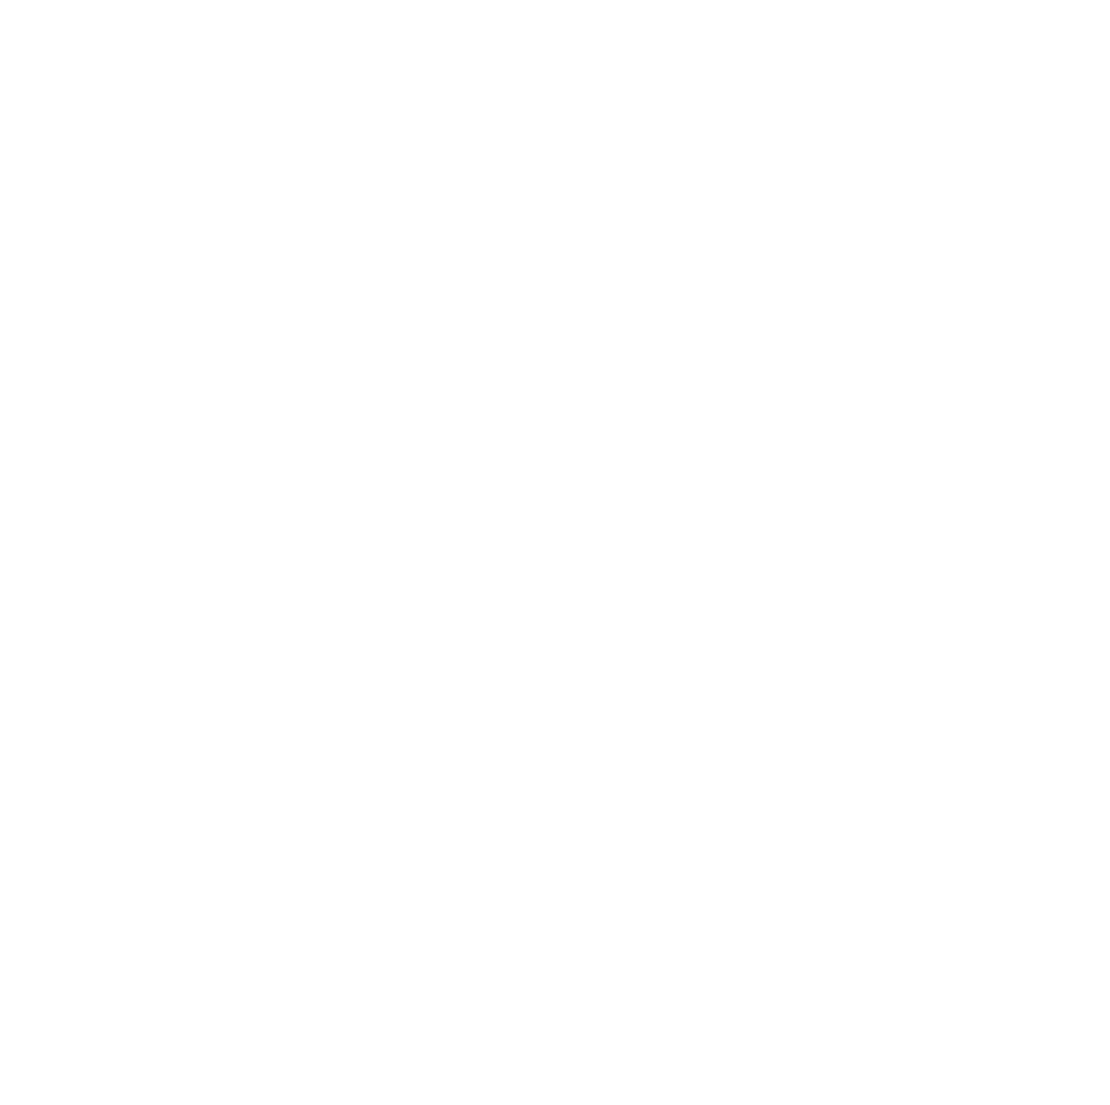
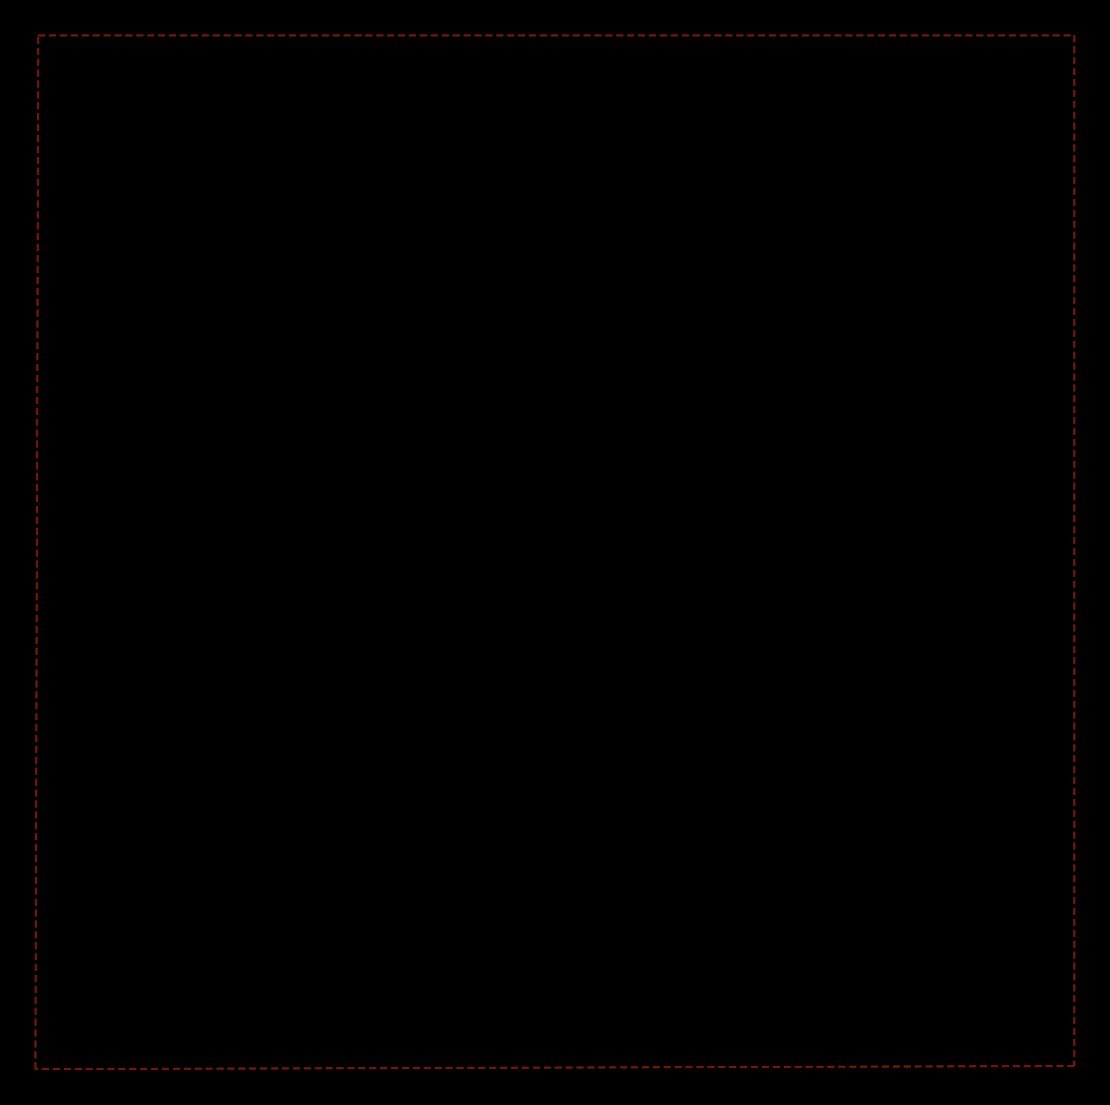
top zone outline: none -> (38, 35) (35, 1069) (1074, 1065) (1074, 35) (38, 35)

